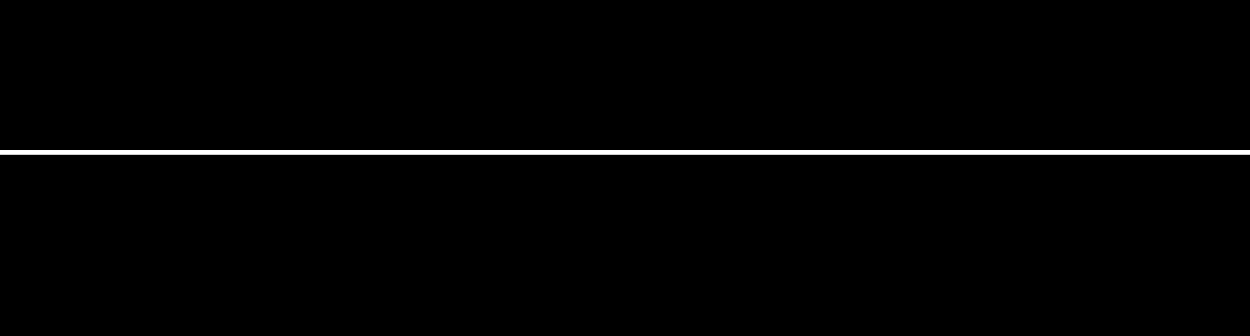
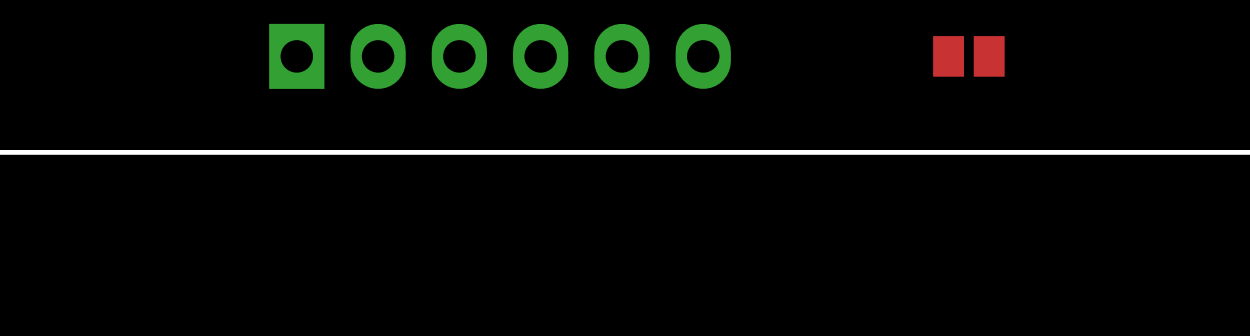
part: none -> (500, 56)
part: none -> (968, 56)

